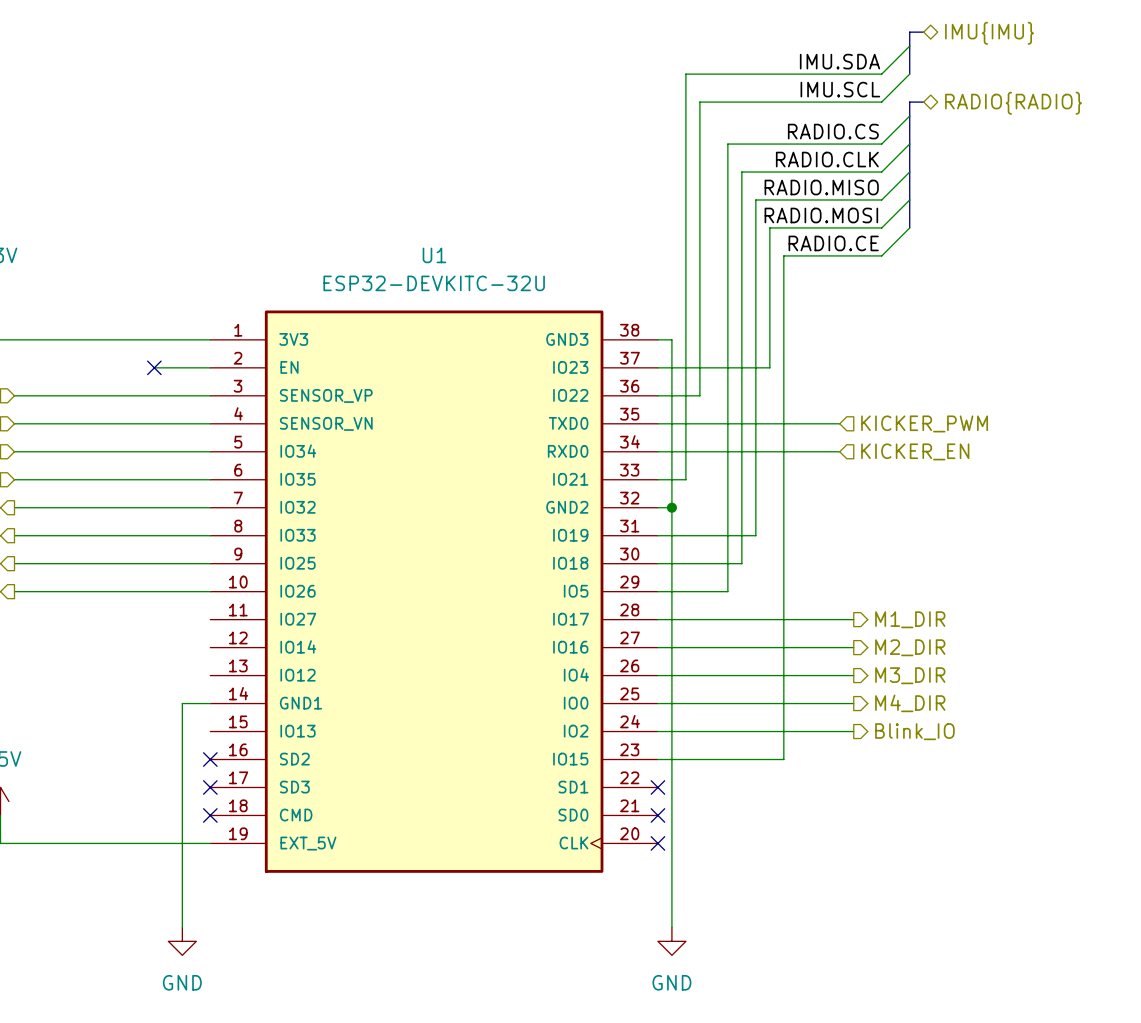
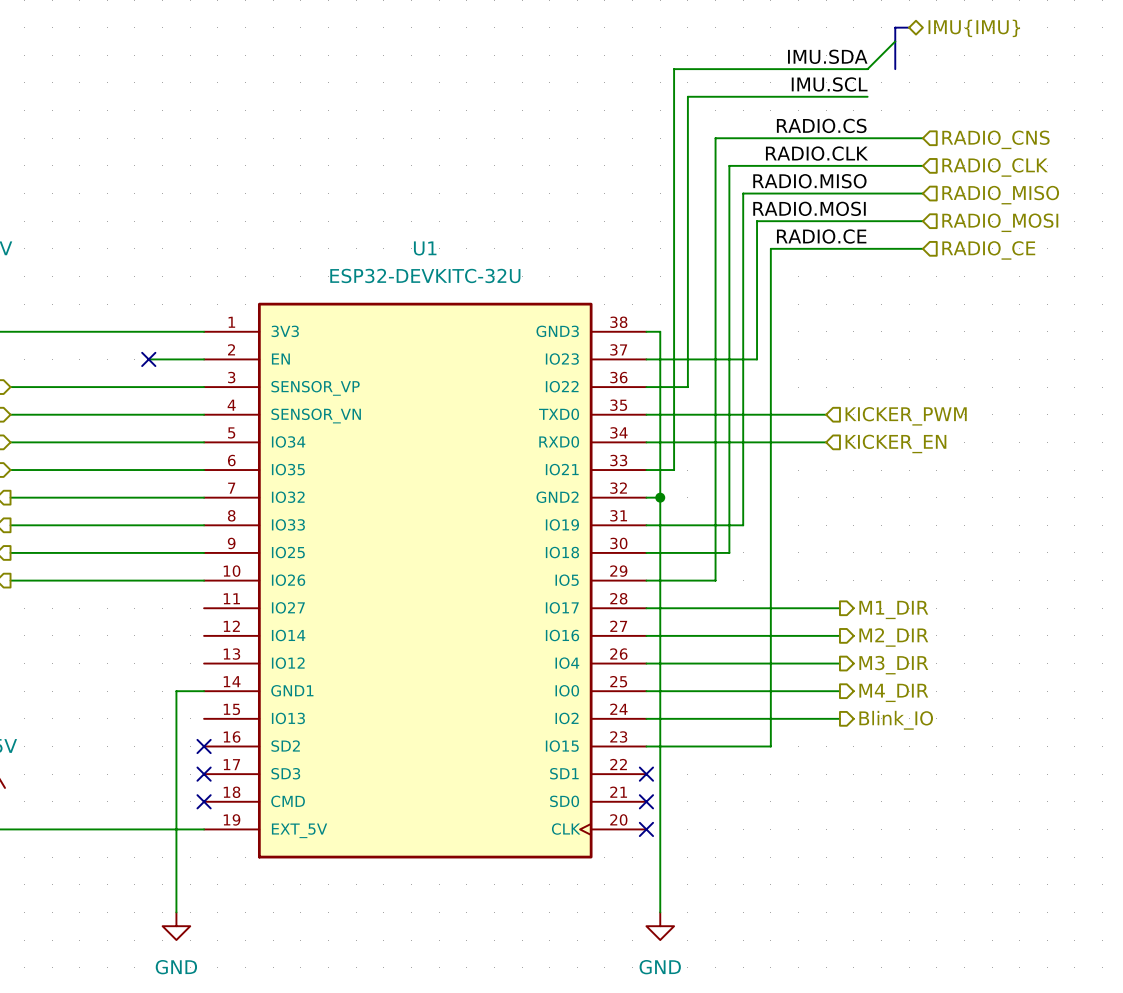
wire: (909, 74) (881, 102) -> none
bus: (923, 102) (909, 102) (909, 227) -> none
hierarchical label: RADIO{RADIO} (1013, 103) -> none
wire: (909, 116) (881, 144) -> (922, 138) (867, 138)
wire: (909, 144) (881, 172) -> (922, 165) (867, 165)
hierarchical label: none -> RADIO_CNS (995, 139)
wire: (909, 172) (881, 199) -> (922, 193) (867, 193)
hierarchical label: none -> RADIO_CLK (995, 167)
wire: (909, 199) (881, 227) -> (922, 221) (867, 221)
hierarchical label: none -> RADIO_MISO (1000, 195)
wire: (909, 227) (881, 255) -> (922, 248) (867, 248)
hierarchical label: none -> RADIO_MOSI (1000, 222)
hierarchical label: none -> RADIO_CE (988, 250)

